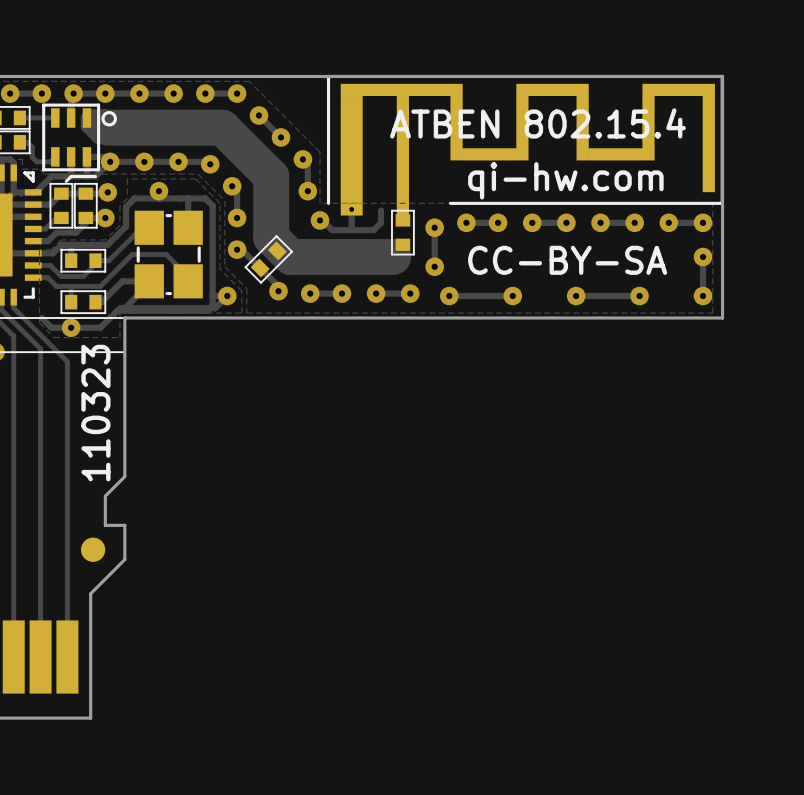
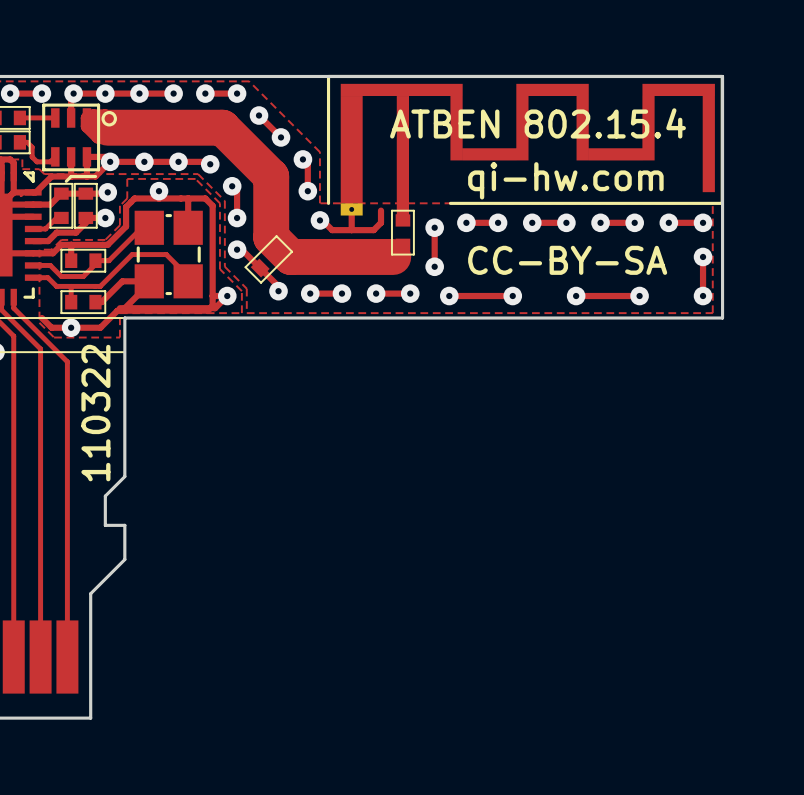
text: 110323 (95, 413) -> none
text: none -> 110322 (95, 413)
part: (93, 549) -> none

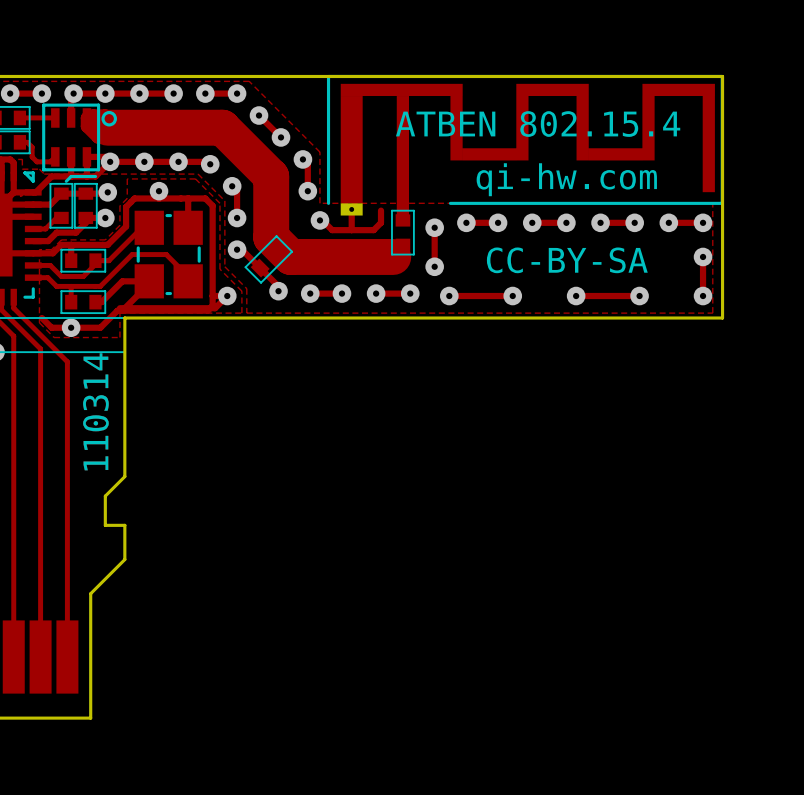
text: none -> 110314 (95, 411)
text: 110322 (95, 413) -> none

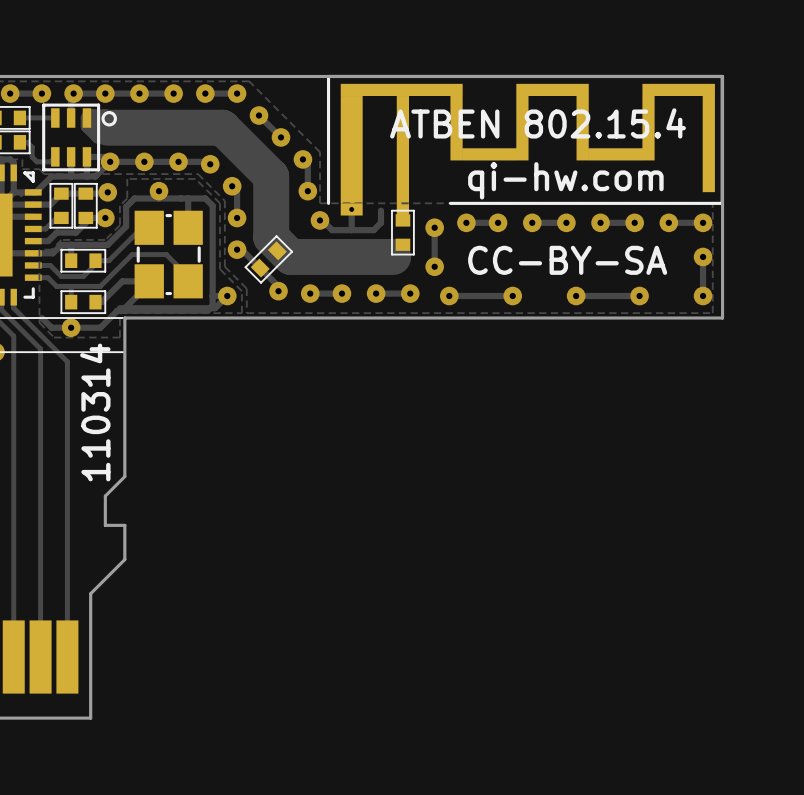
line: (95, 176) (71, 176) (66, 181) -> none

